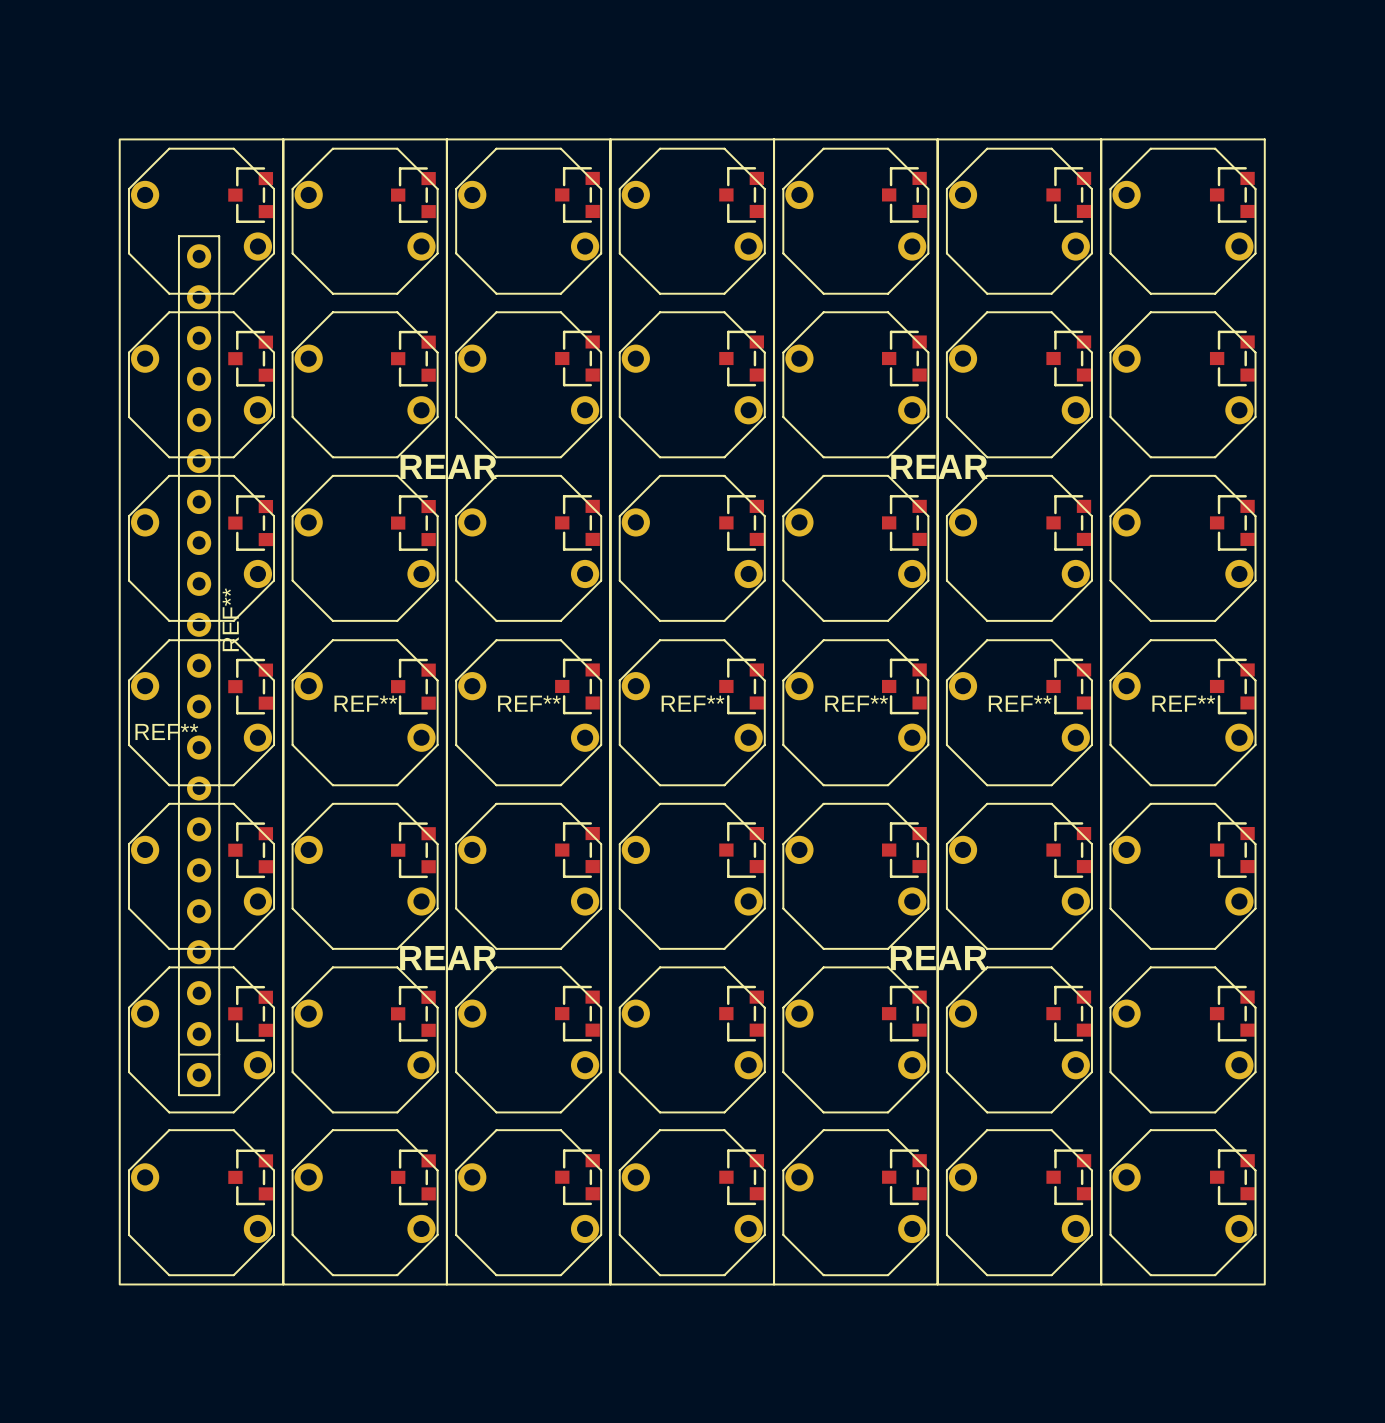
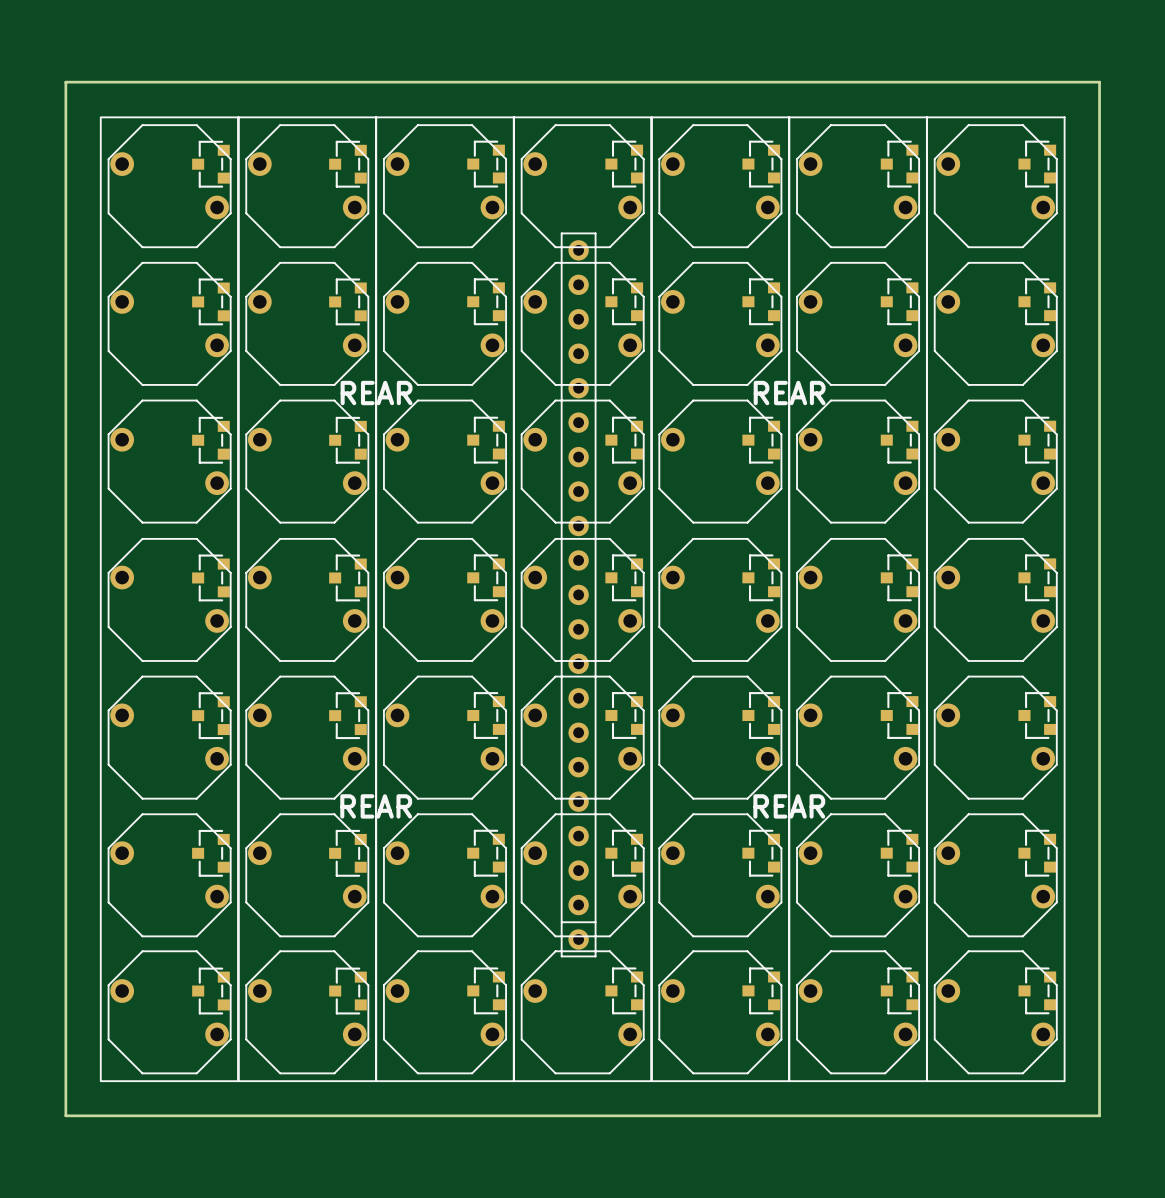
board edge: none -> (65, 82) (1099, 82) (1099, 1115) (65, 1115) (65, 82)
REF**: (199, 665) -> none
REF** name: REF** (365, 703) -> none
REF** name: REF** (529, 703) -> none
REF** name: REF** (693, 703) -> none
REF** name: REF** (856, 703) -> none
REF** name: REF** (1020, 703) -> none
REF** name: REF** (1183, 703) -> none
part: none -> (578, 594)
REF** name: REF** (166, 731) -> none

